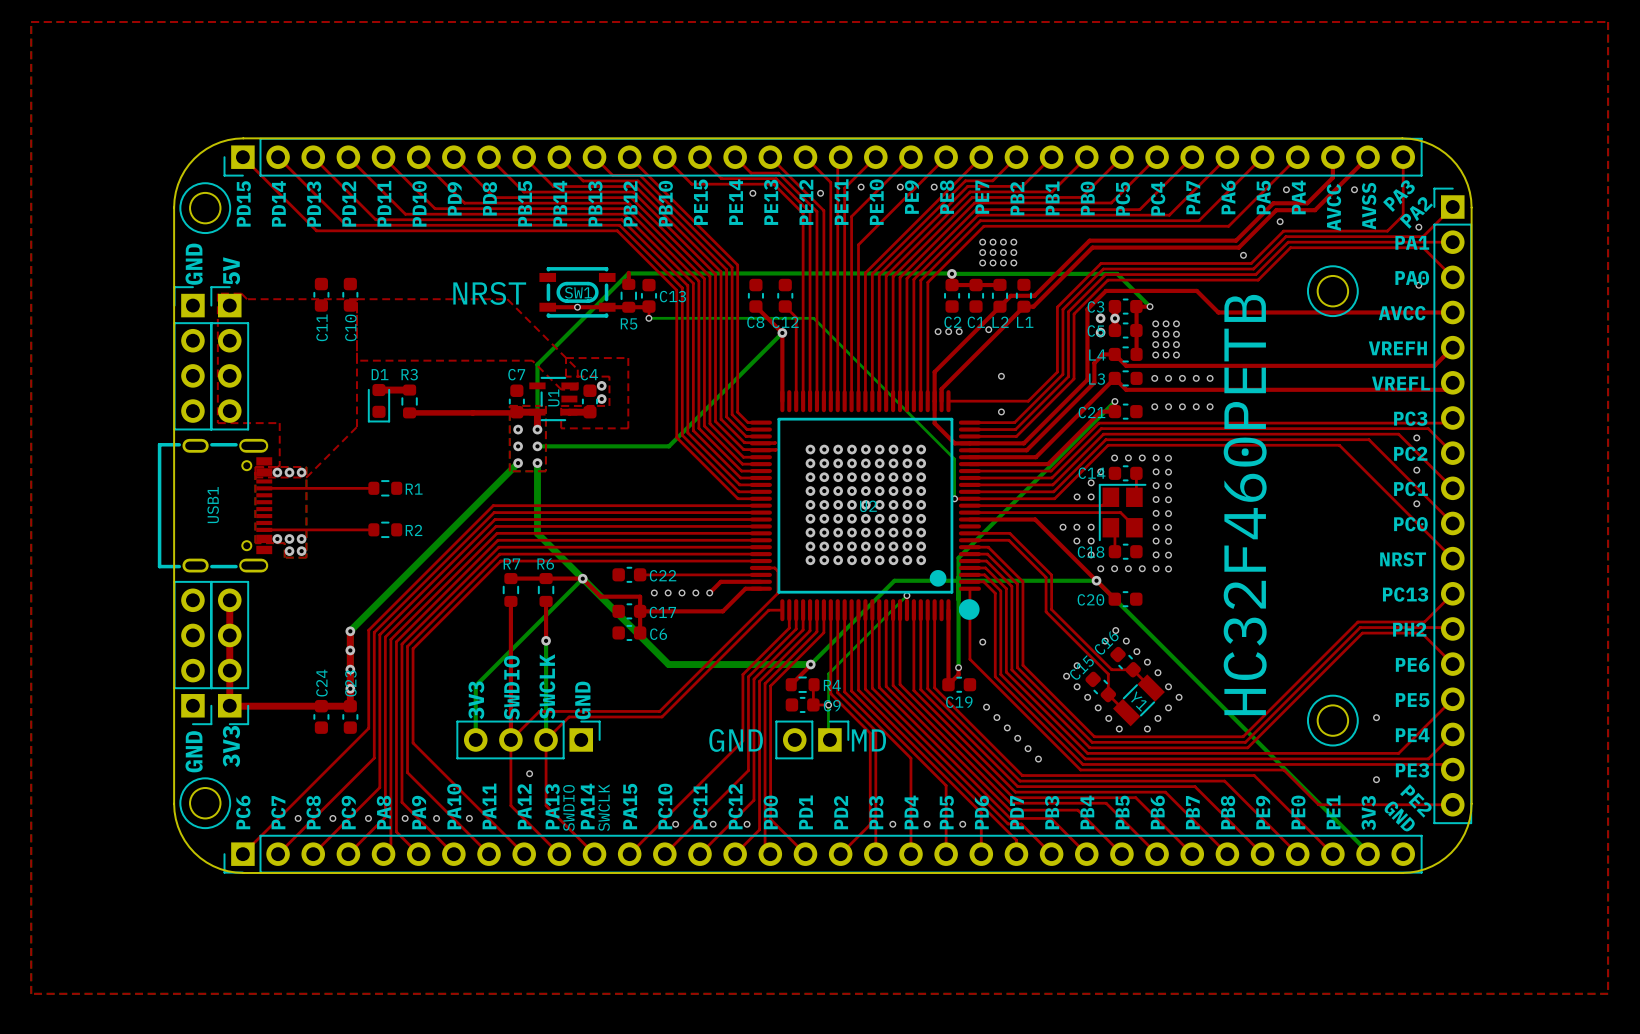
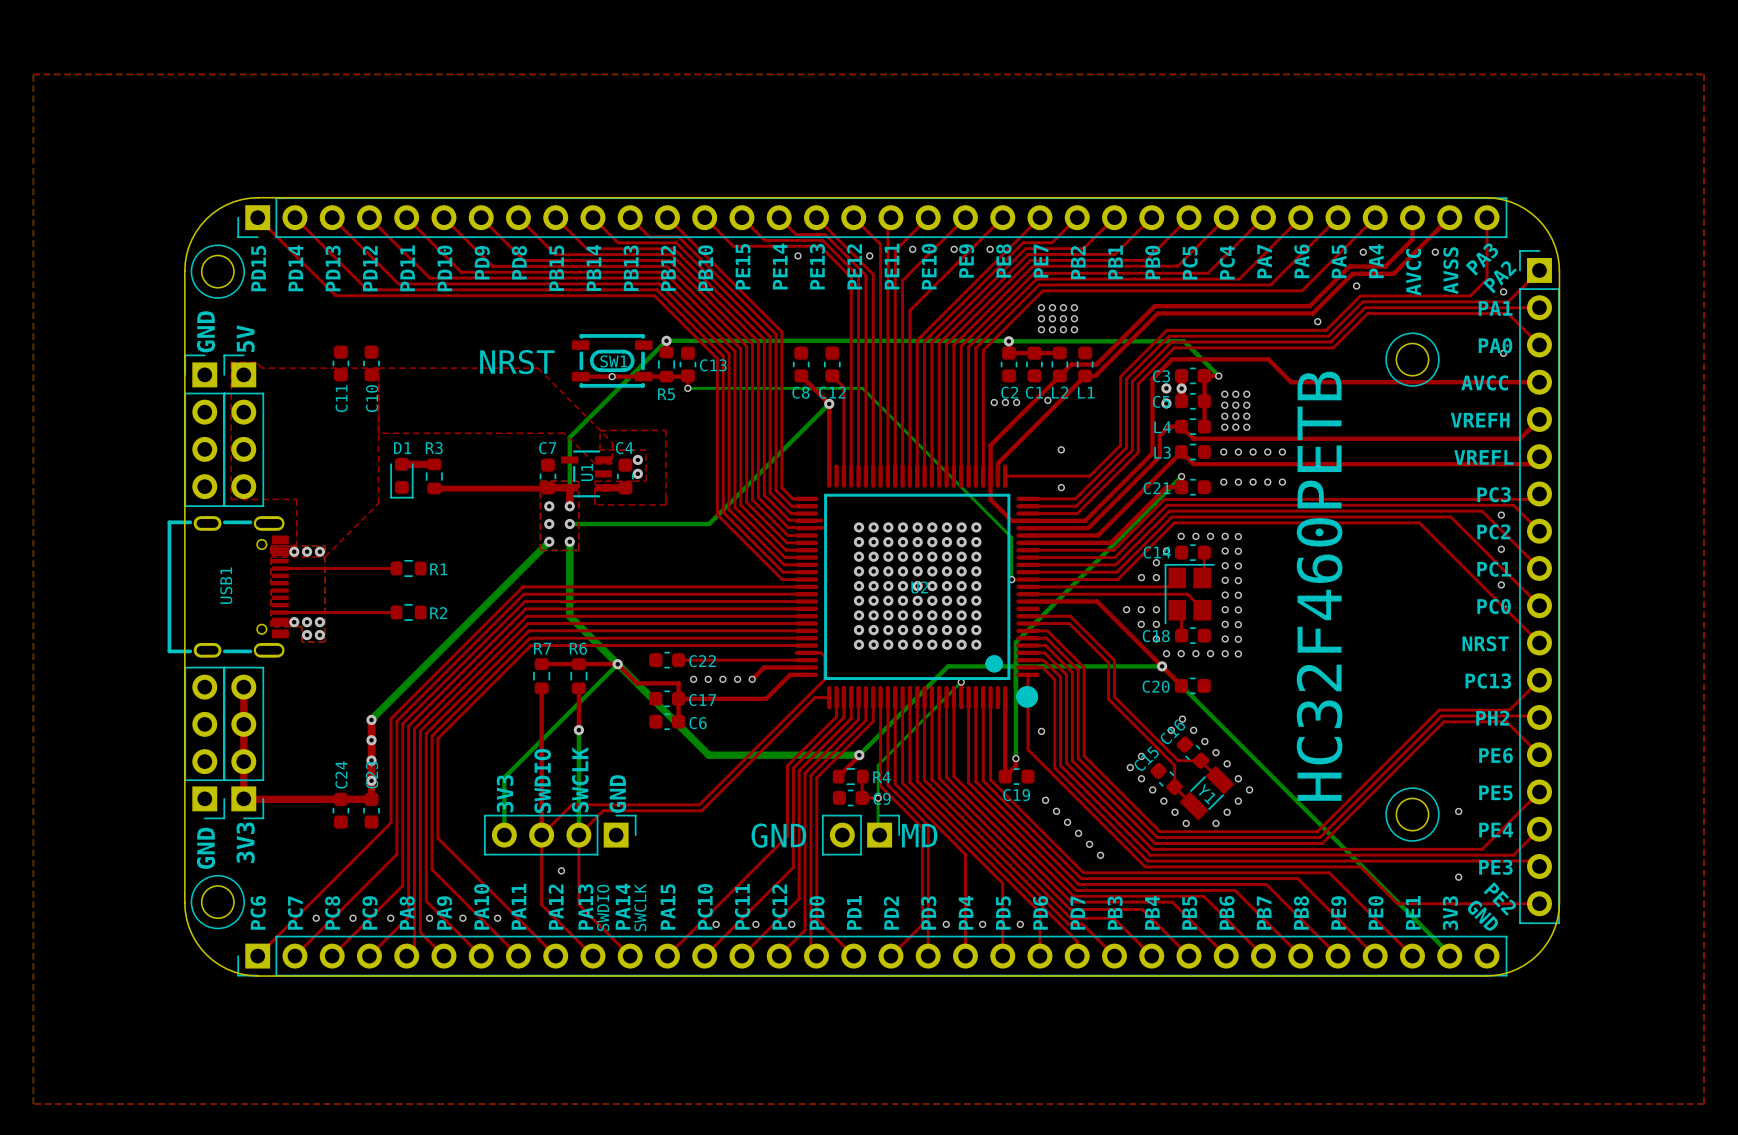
via: none -> (666, 340)

